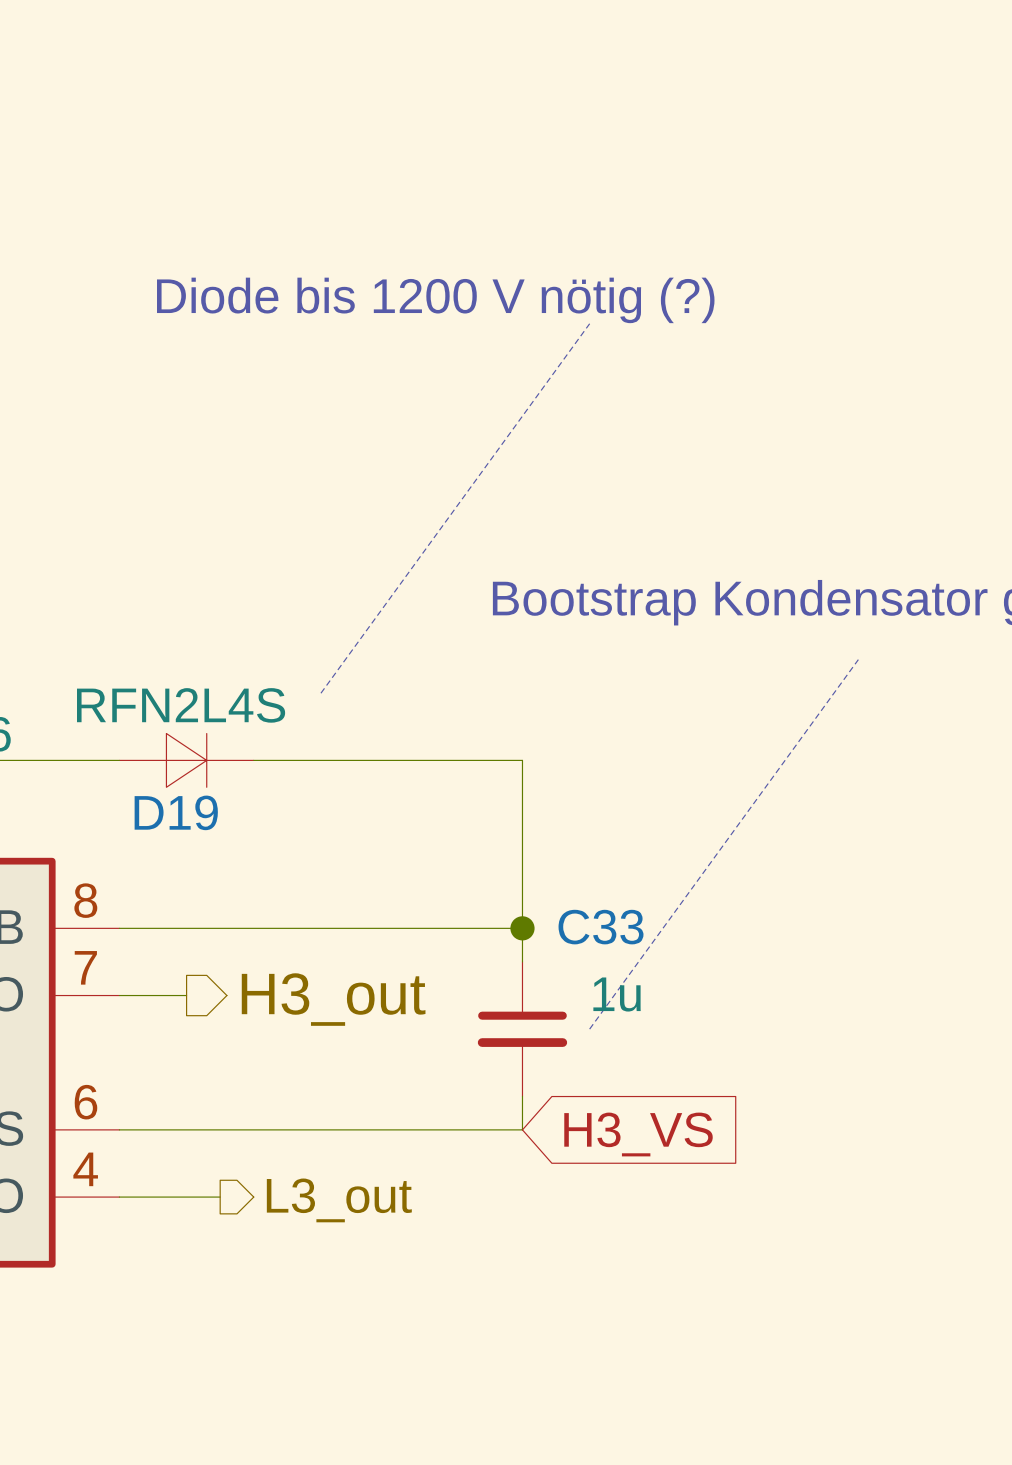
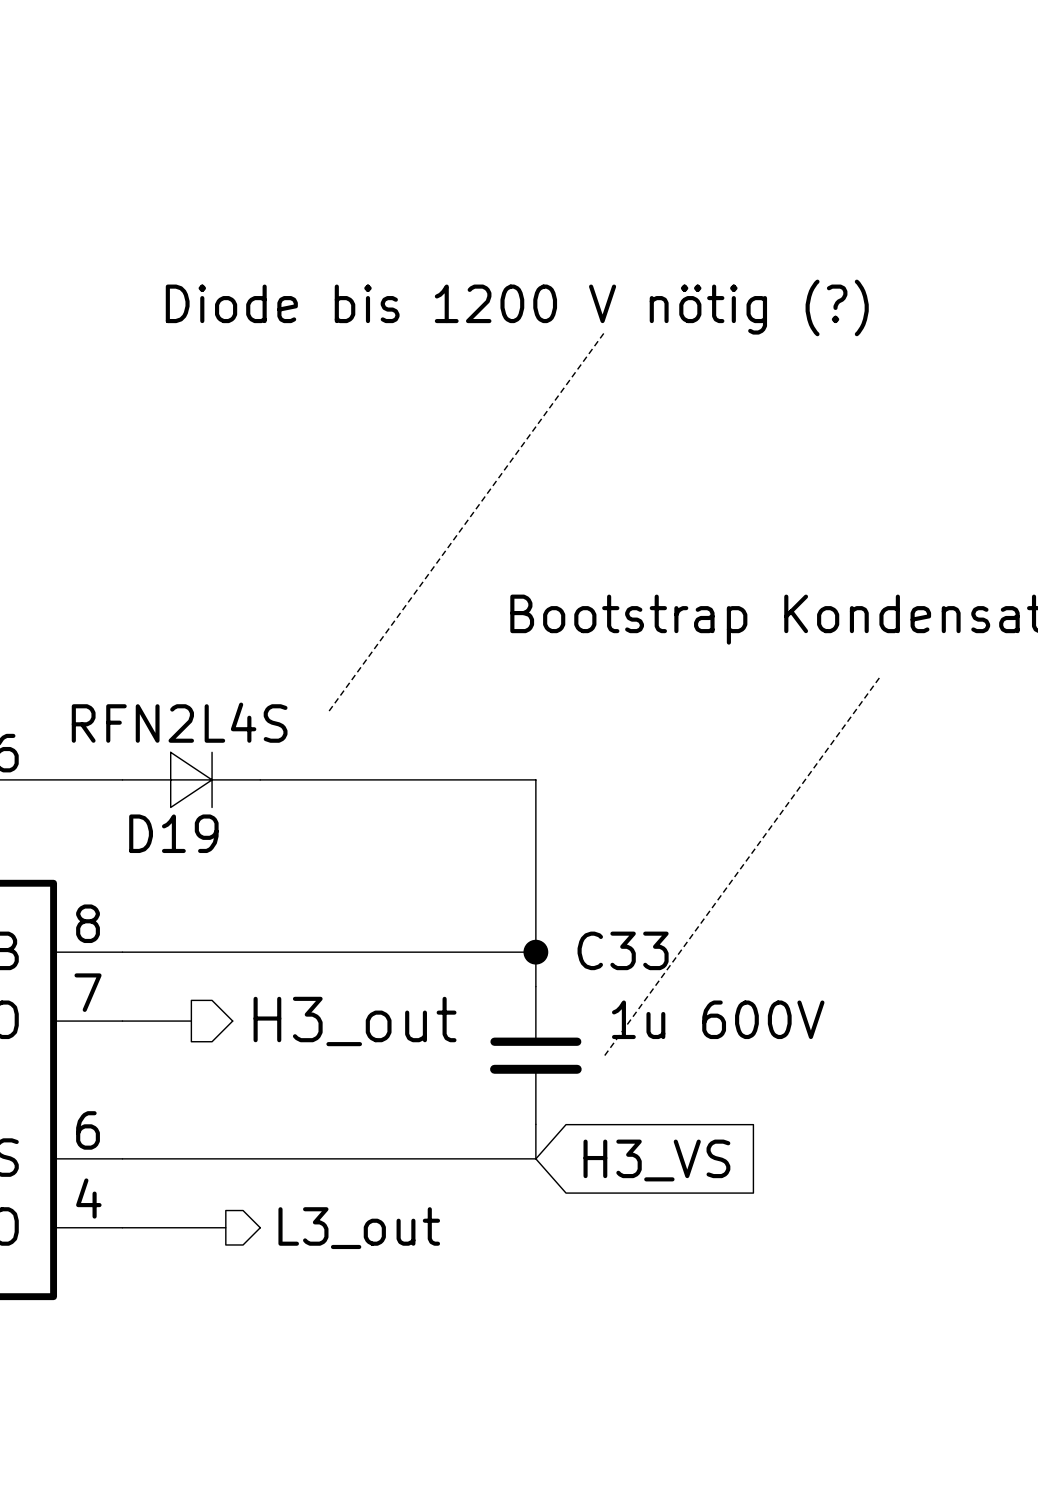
C33 value: 1u (617, 994) -> 1u 600V (718, 1019)

